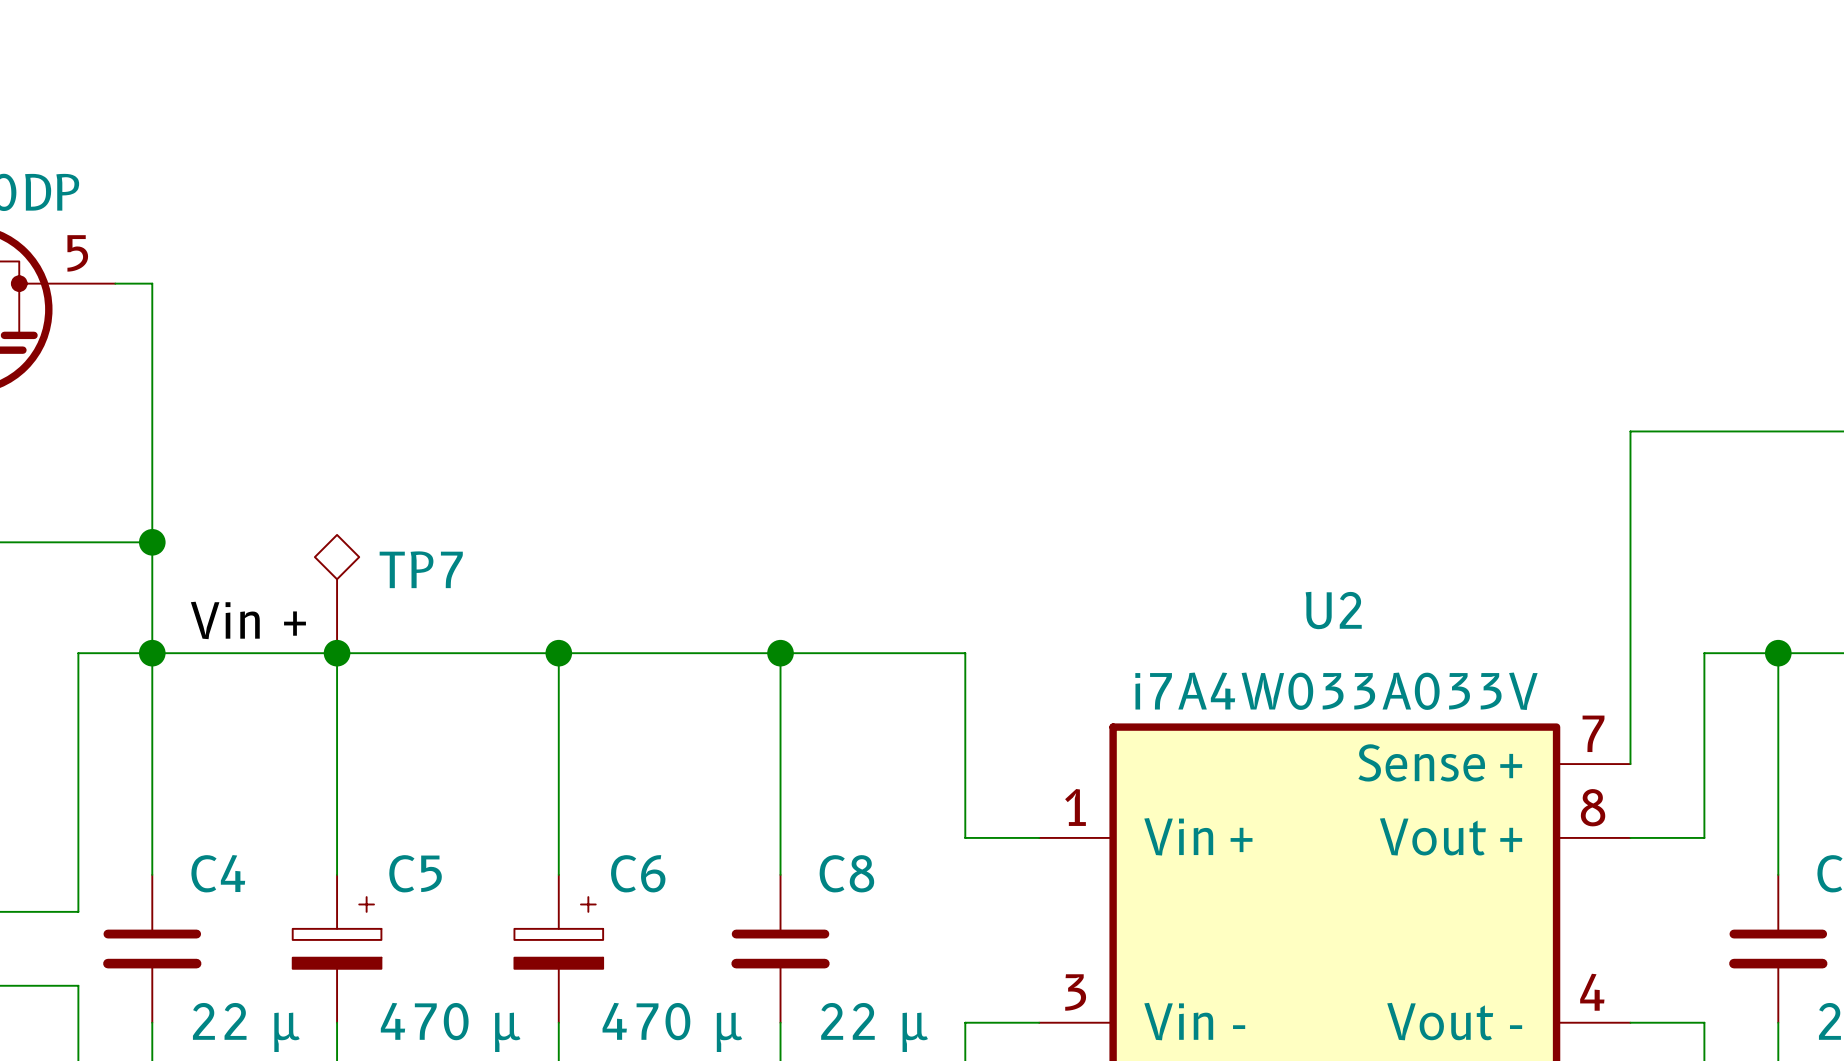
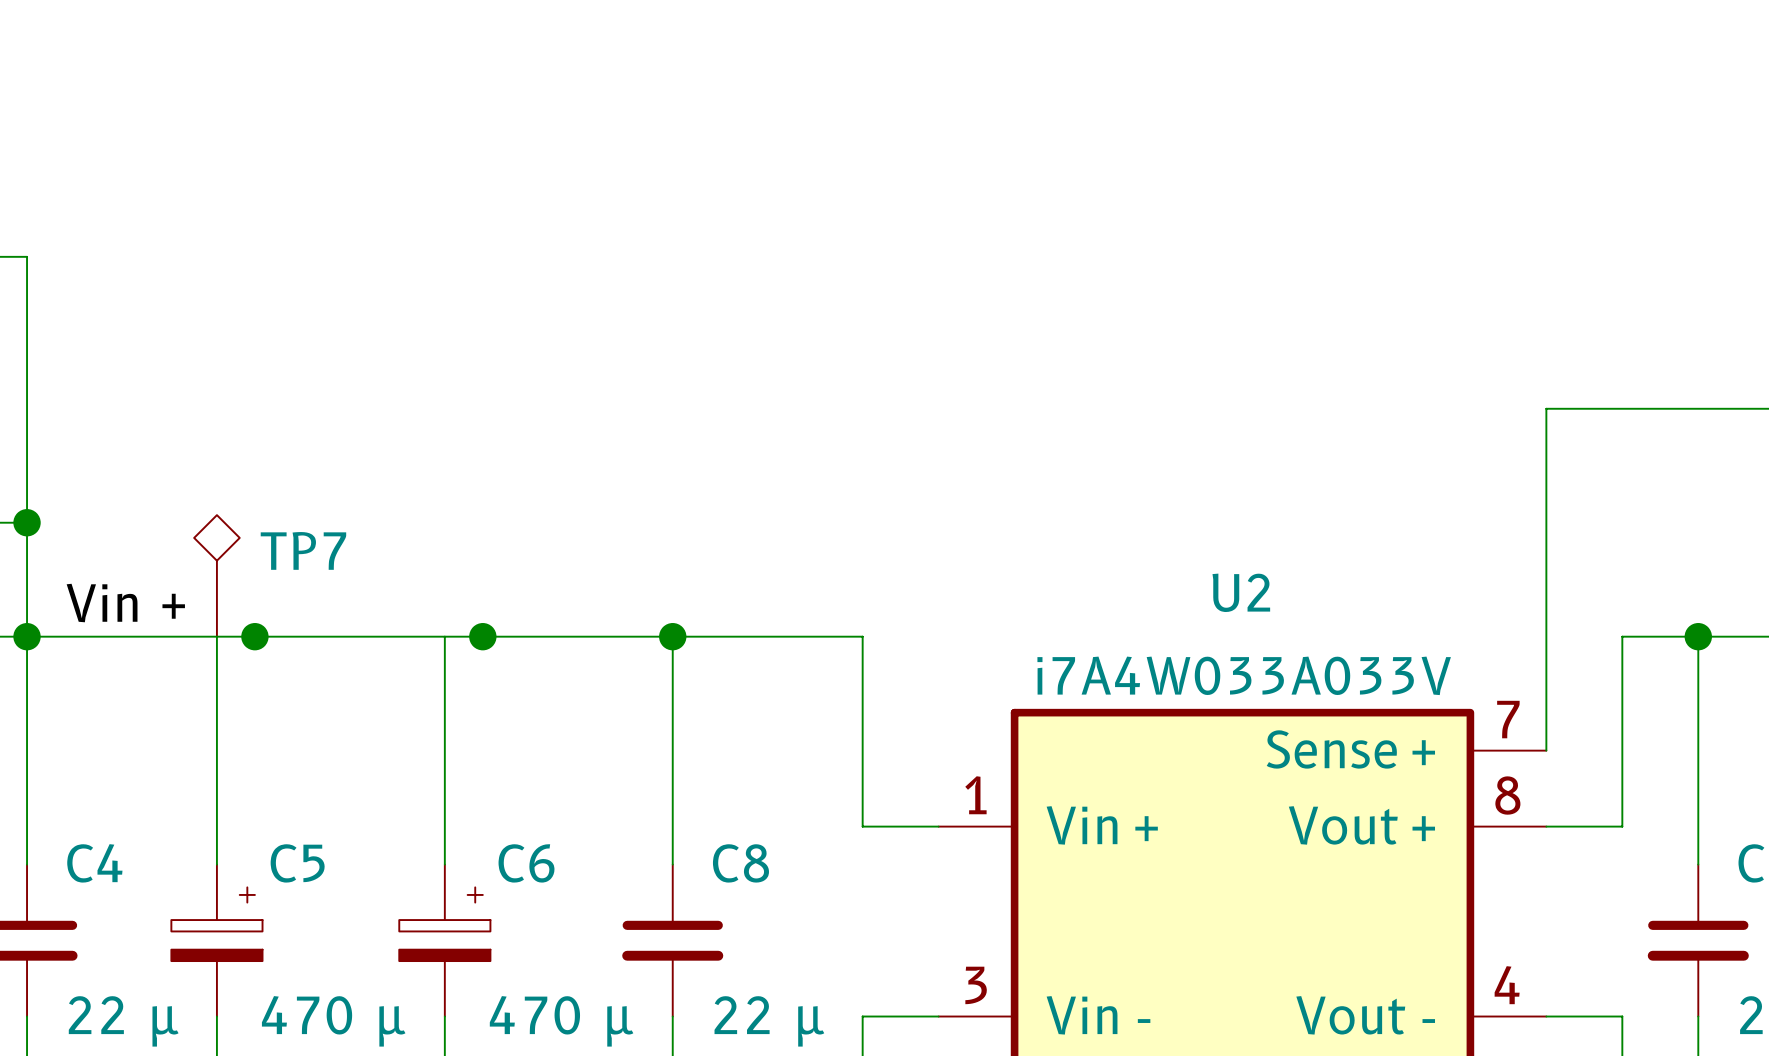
junction position: (337, 653) -> (254, 636)
junction position: (558, 653) -> (482, 636)

